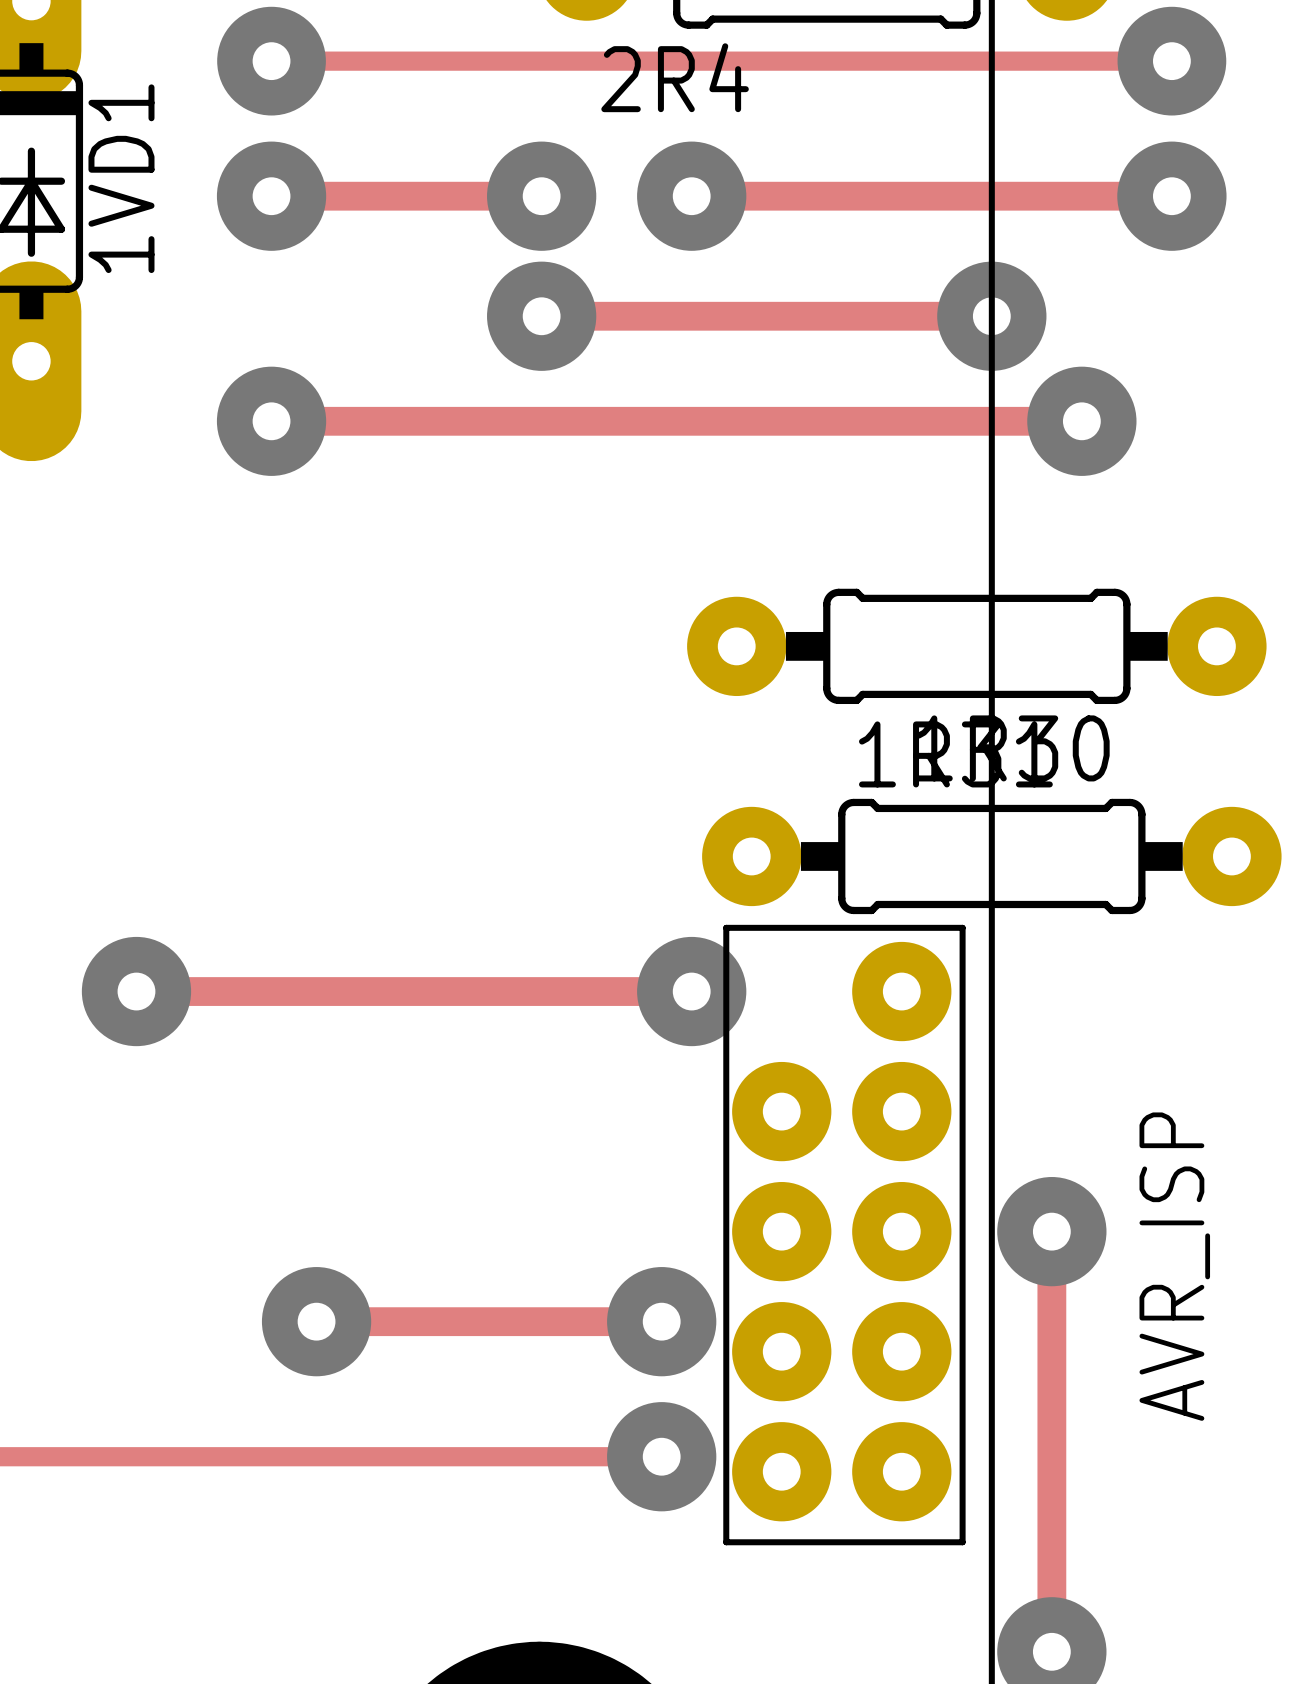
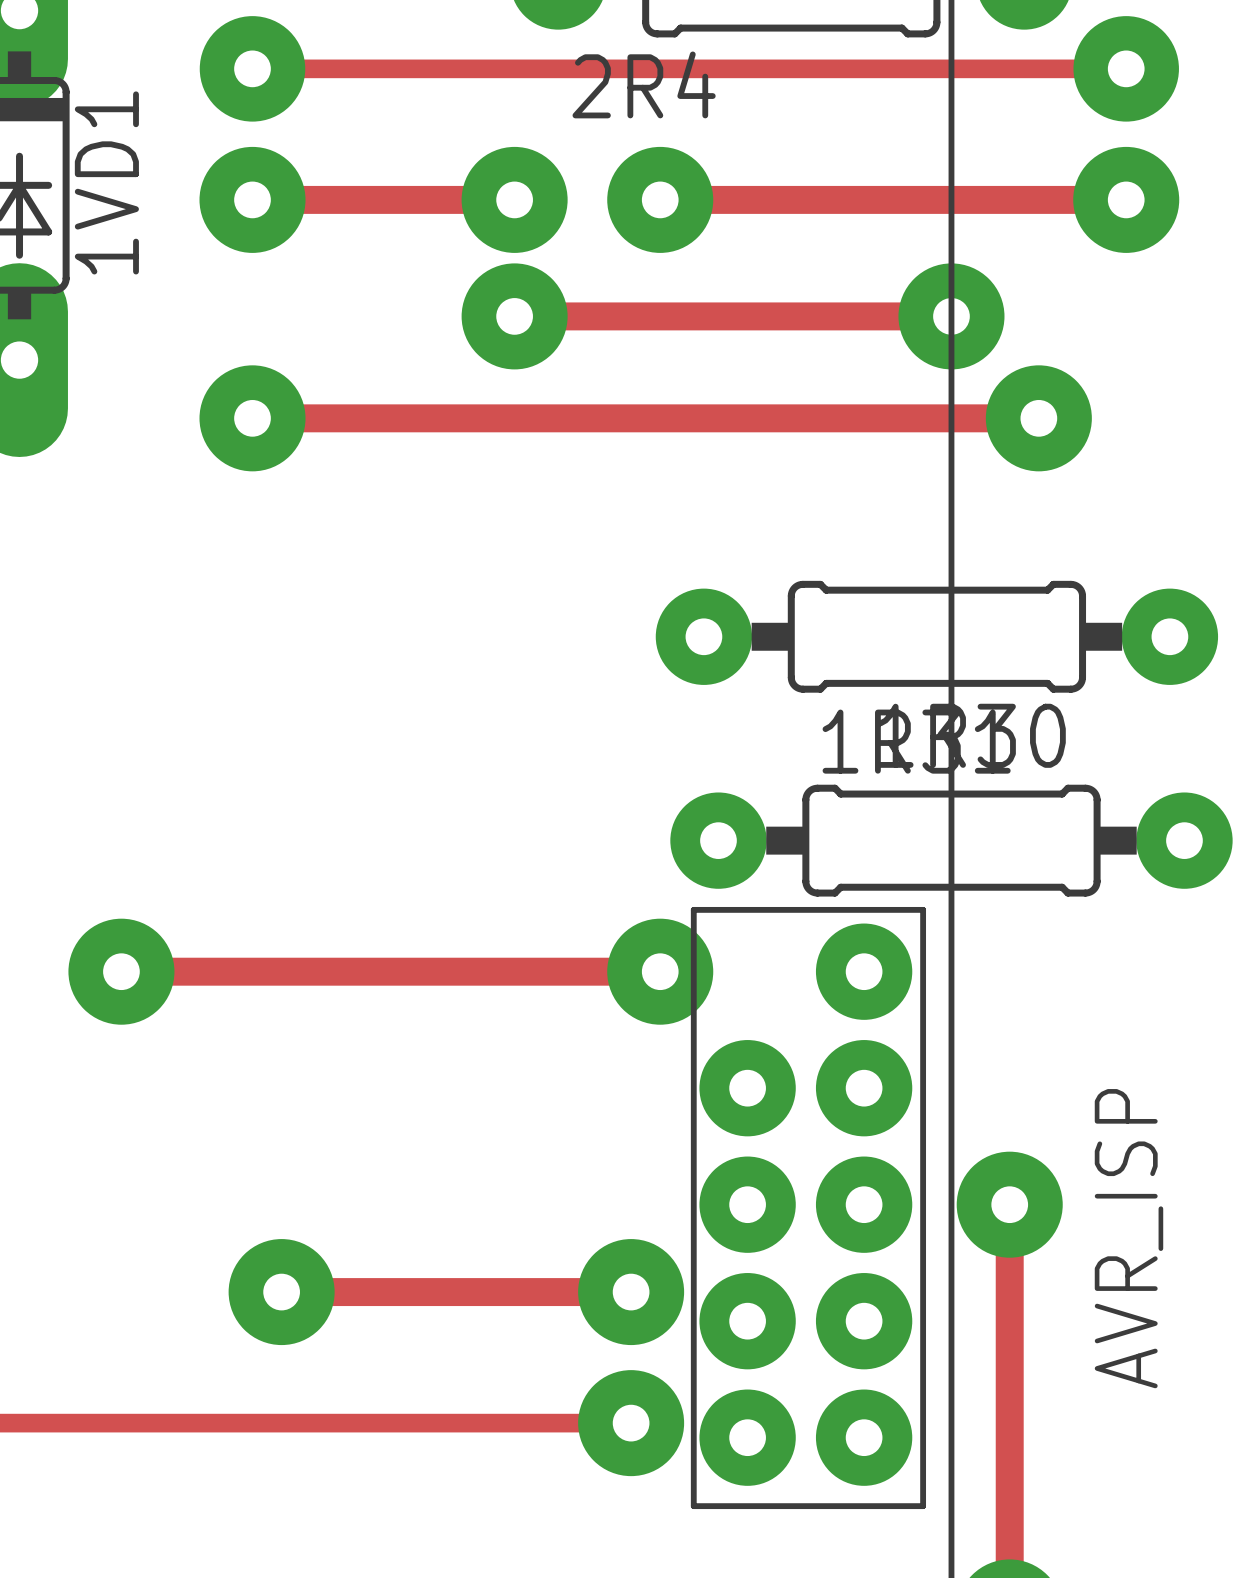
via position: (316, 1321) -> (281, 1292)

